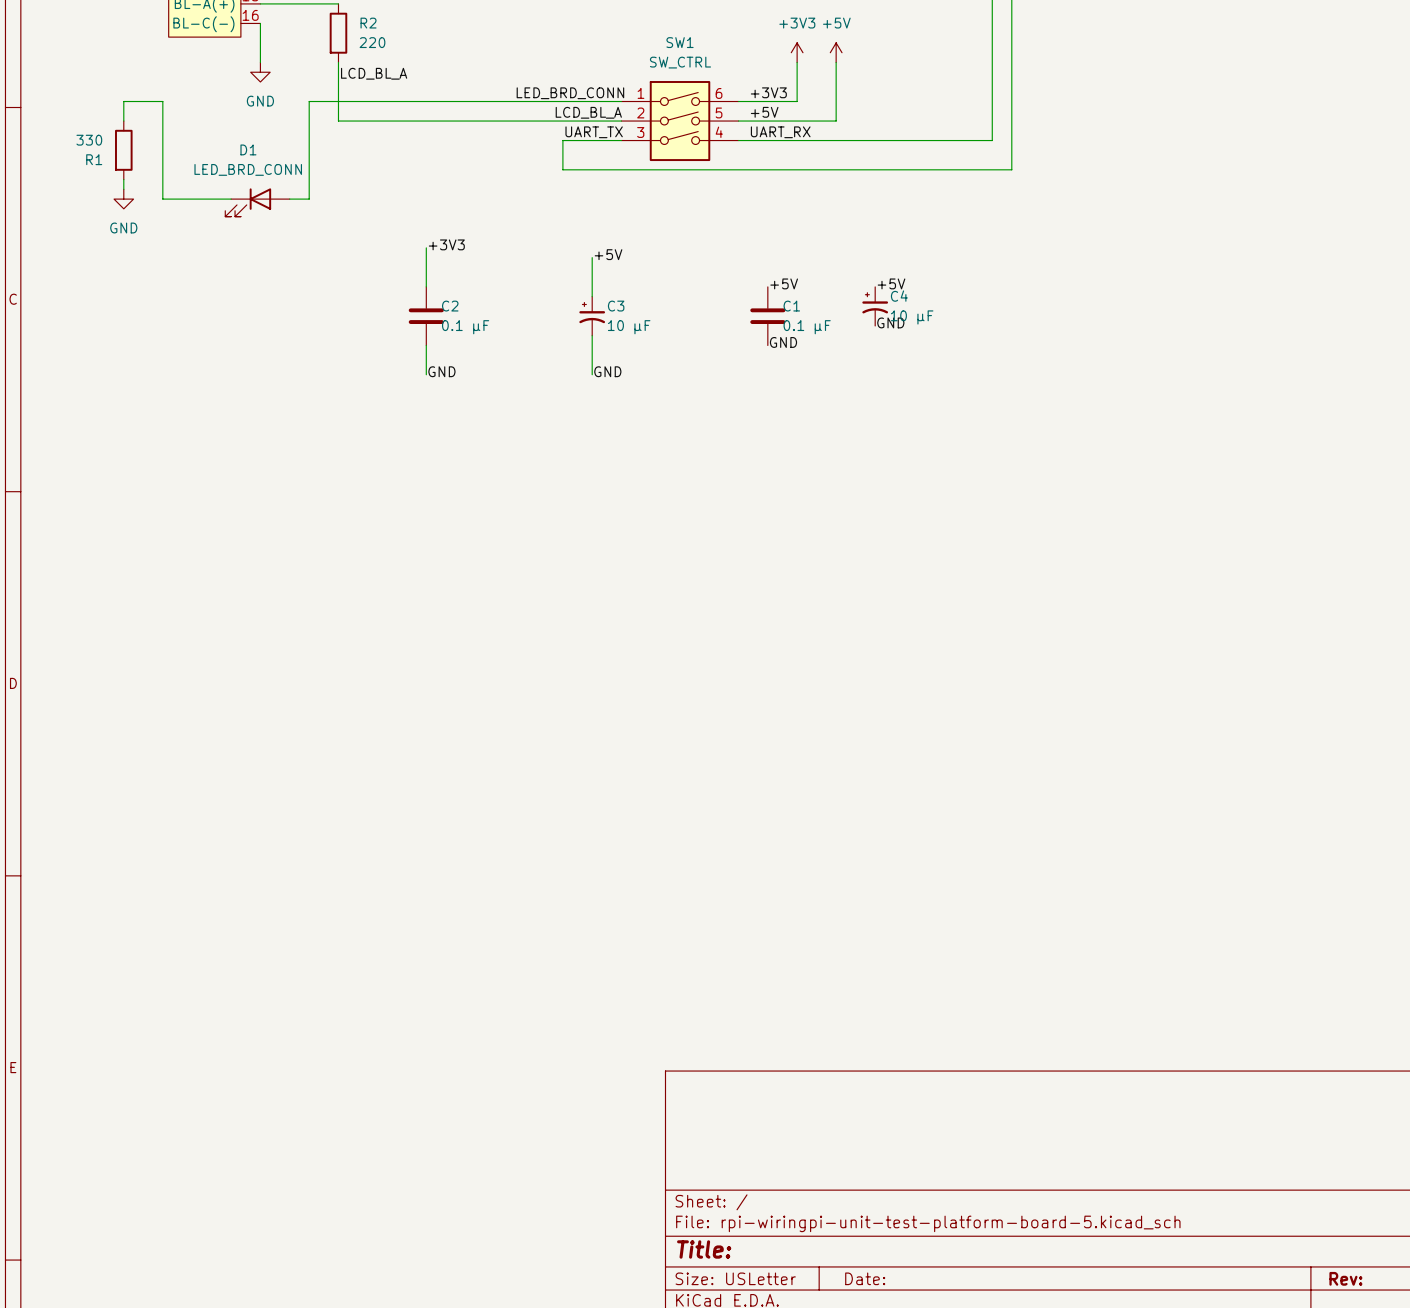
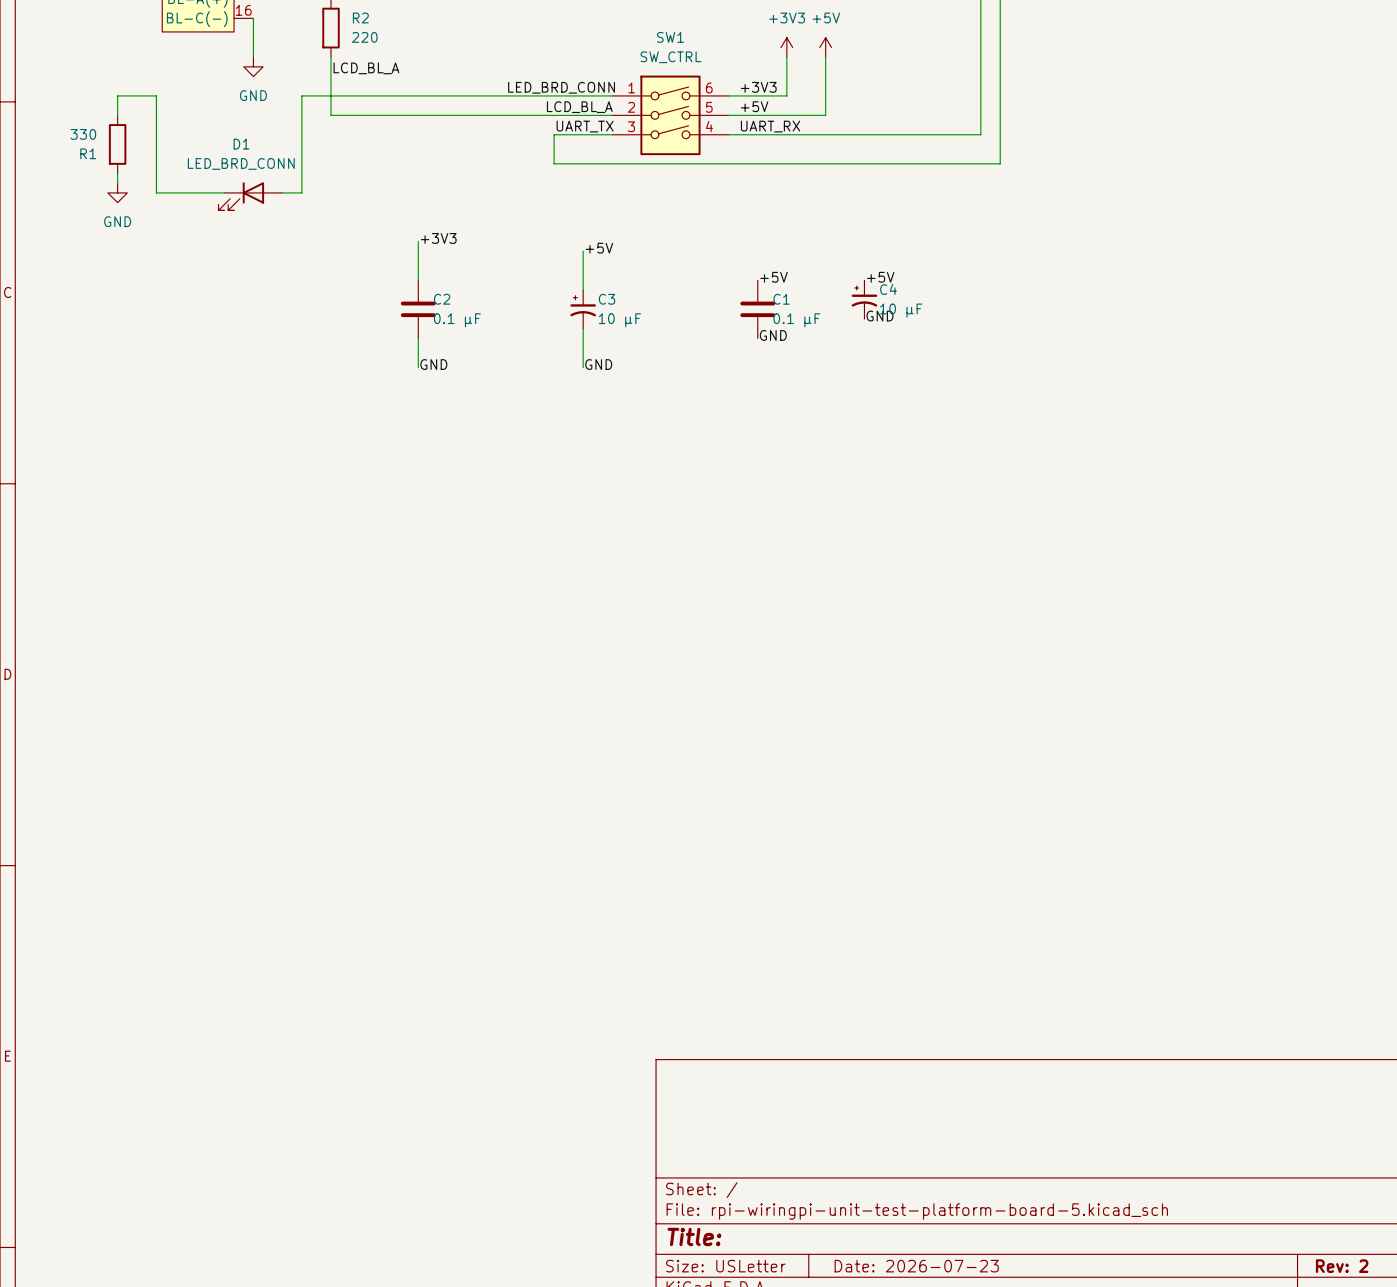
title block: Date: (865, 1278) -> Date: 2026-07-23 (916, 1266)
title block: Rev: (1345, 1278) -> Rev: 2 (1342, 1266)

